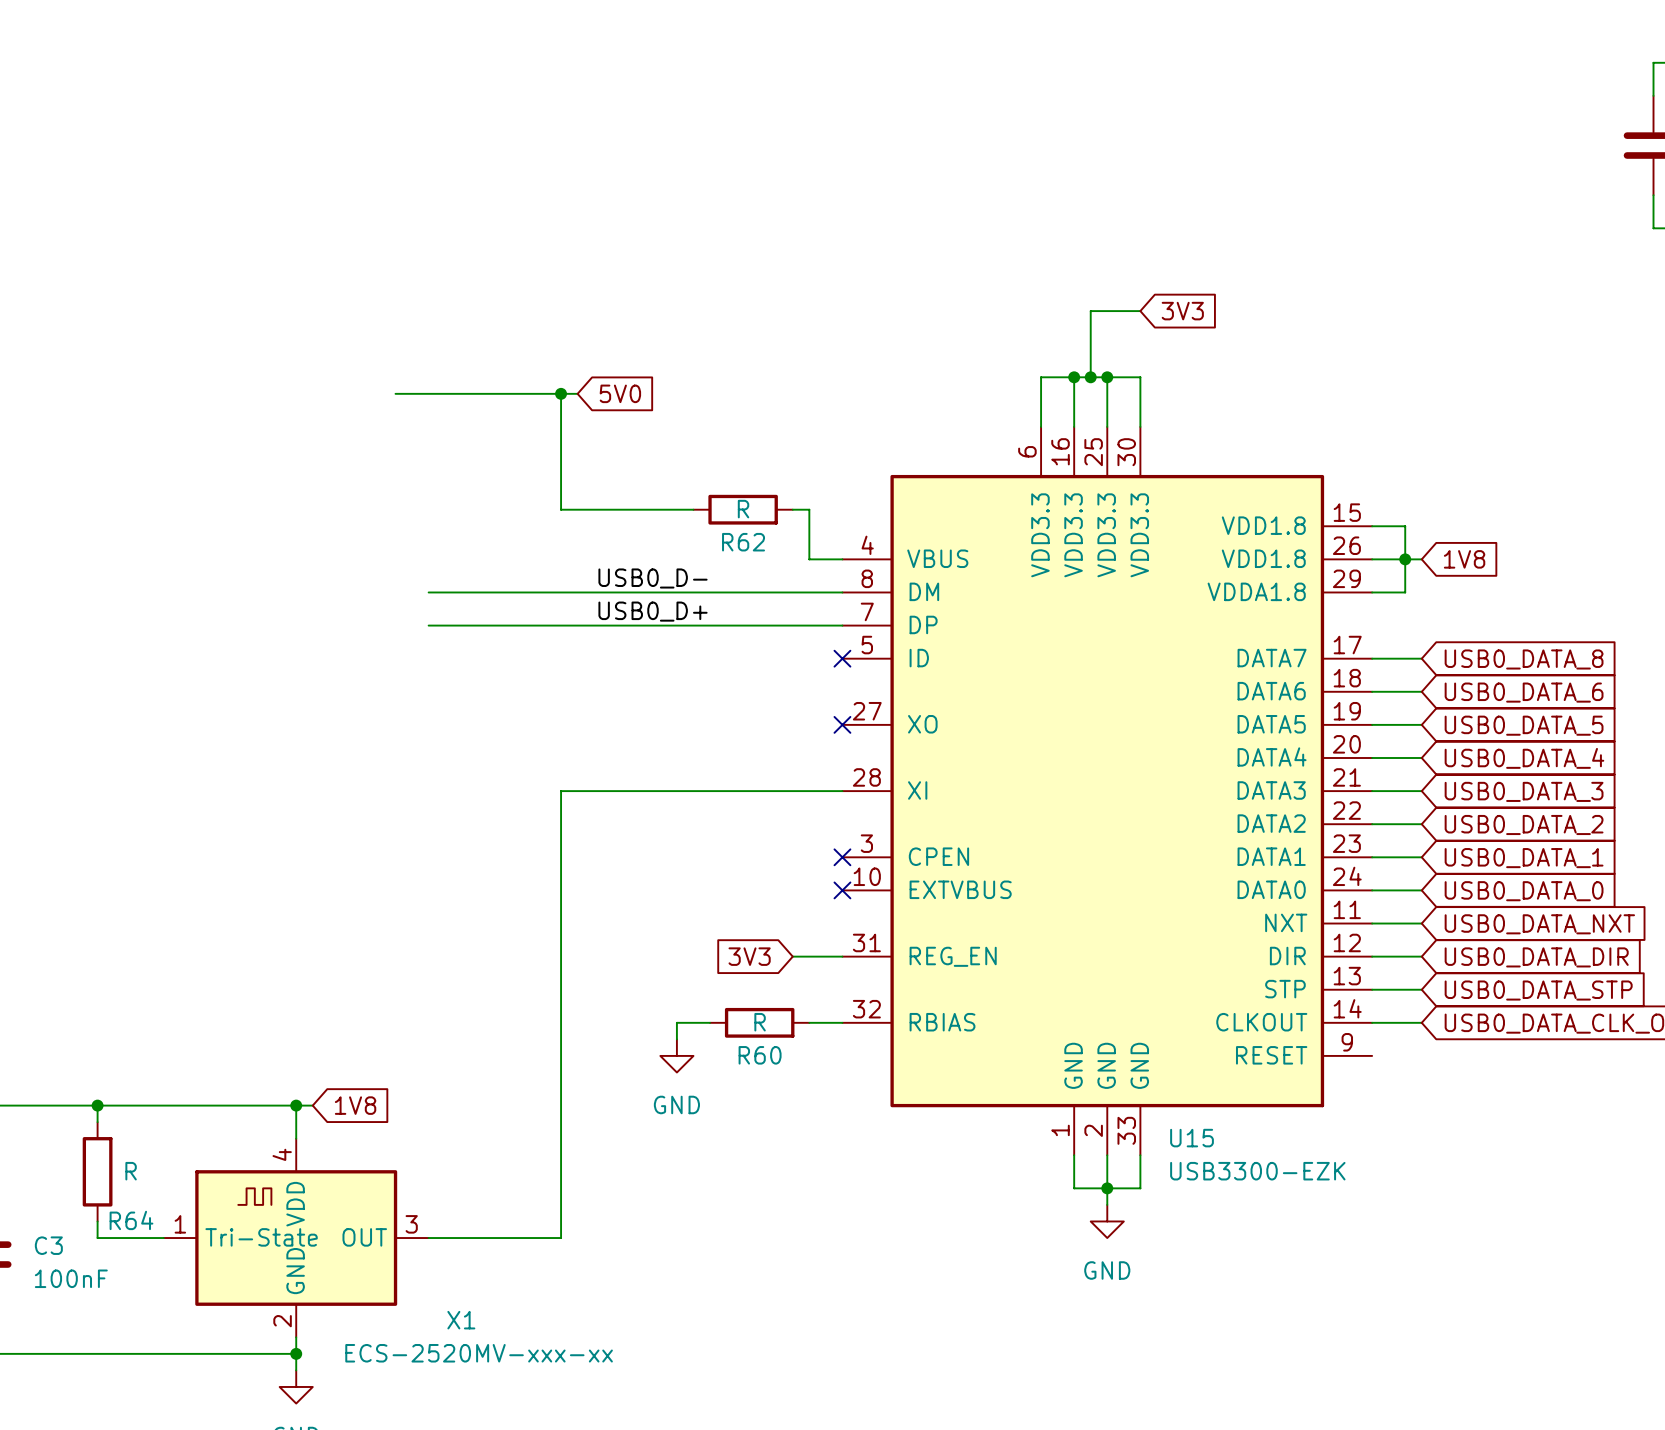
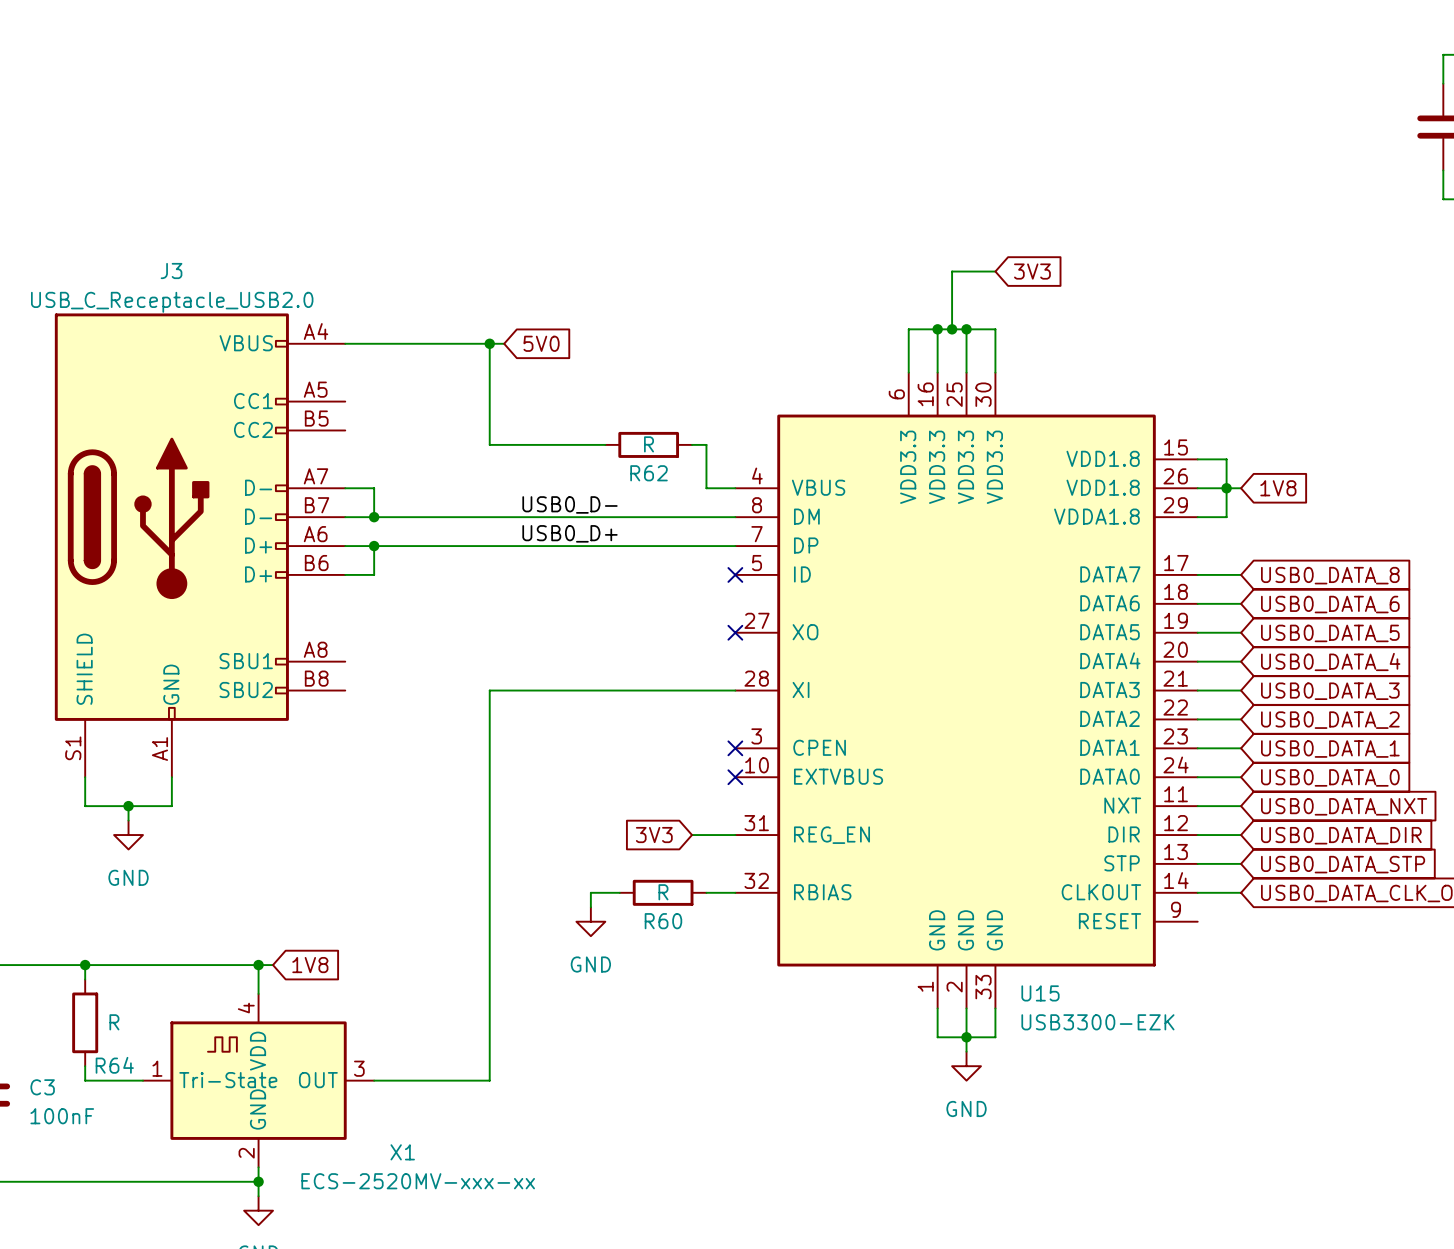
wire: none -> (345, 488) (374, 488) (374, 517) (345, 517)
junction: none -> (374, 517)
J3: none -> USB_C_Receptacle_USB2.0 (200, 545)
wire: none -> (345, 546) (374, 546) (374, 574) (345, 574)
junction: none -> (374, 546)
wire: none -> (85, 777) (85, 806) (171, 806) (171, 777)
wire: none -> (128, 806) (128, 820)
junction: none -> (128, 806)
power symbol: none -> GND (128, 835)

